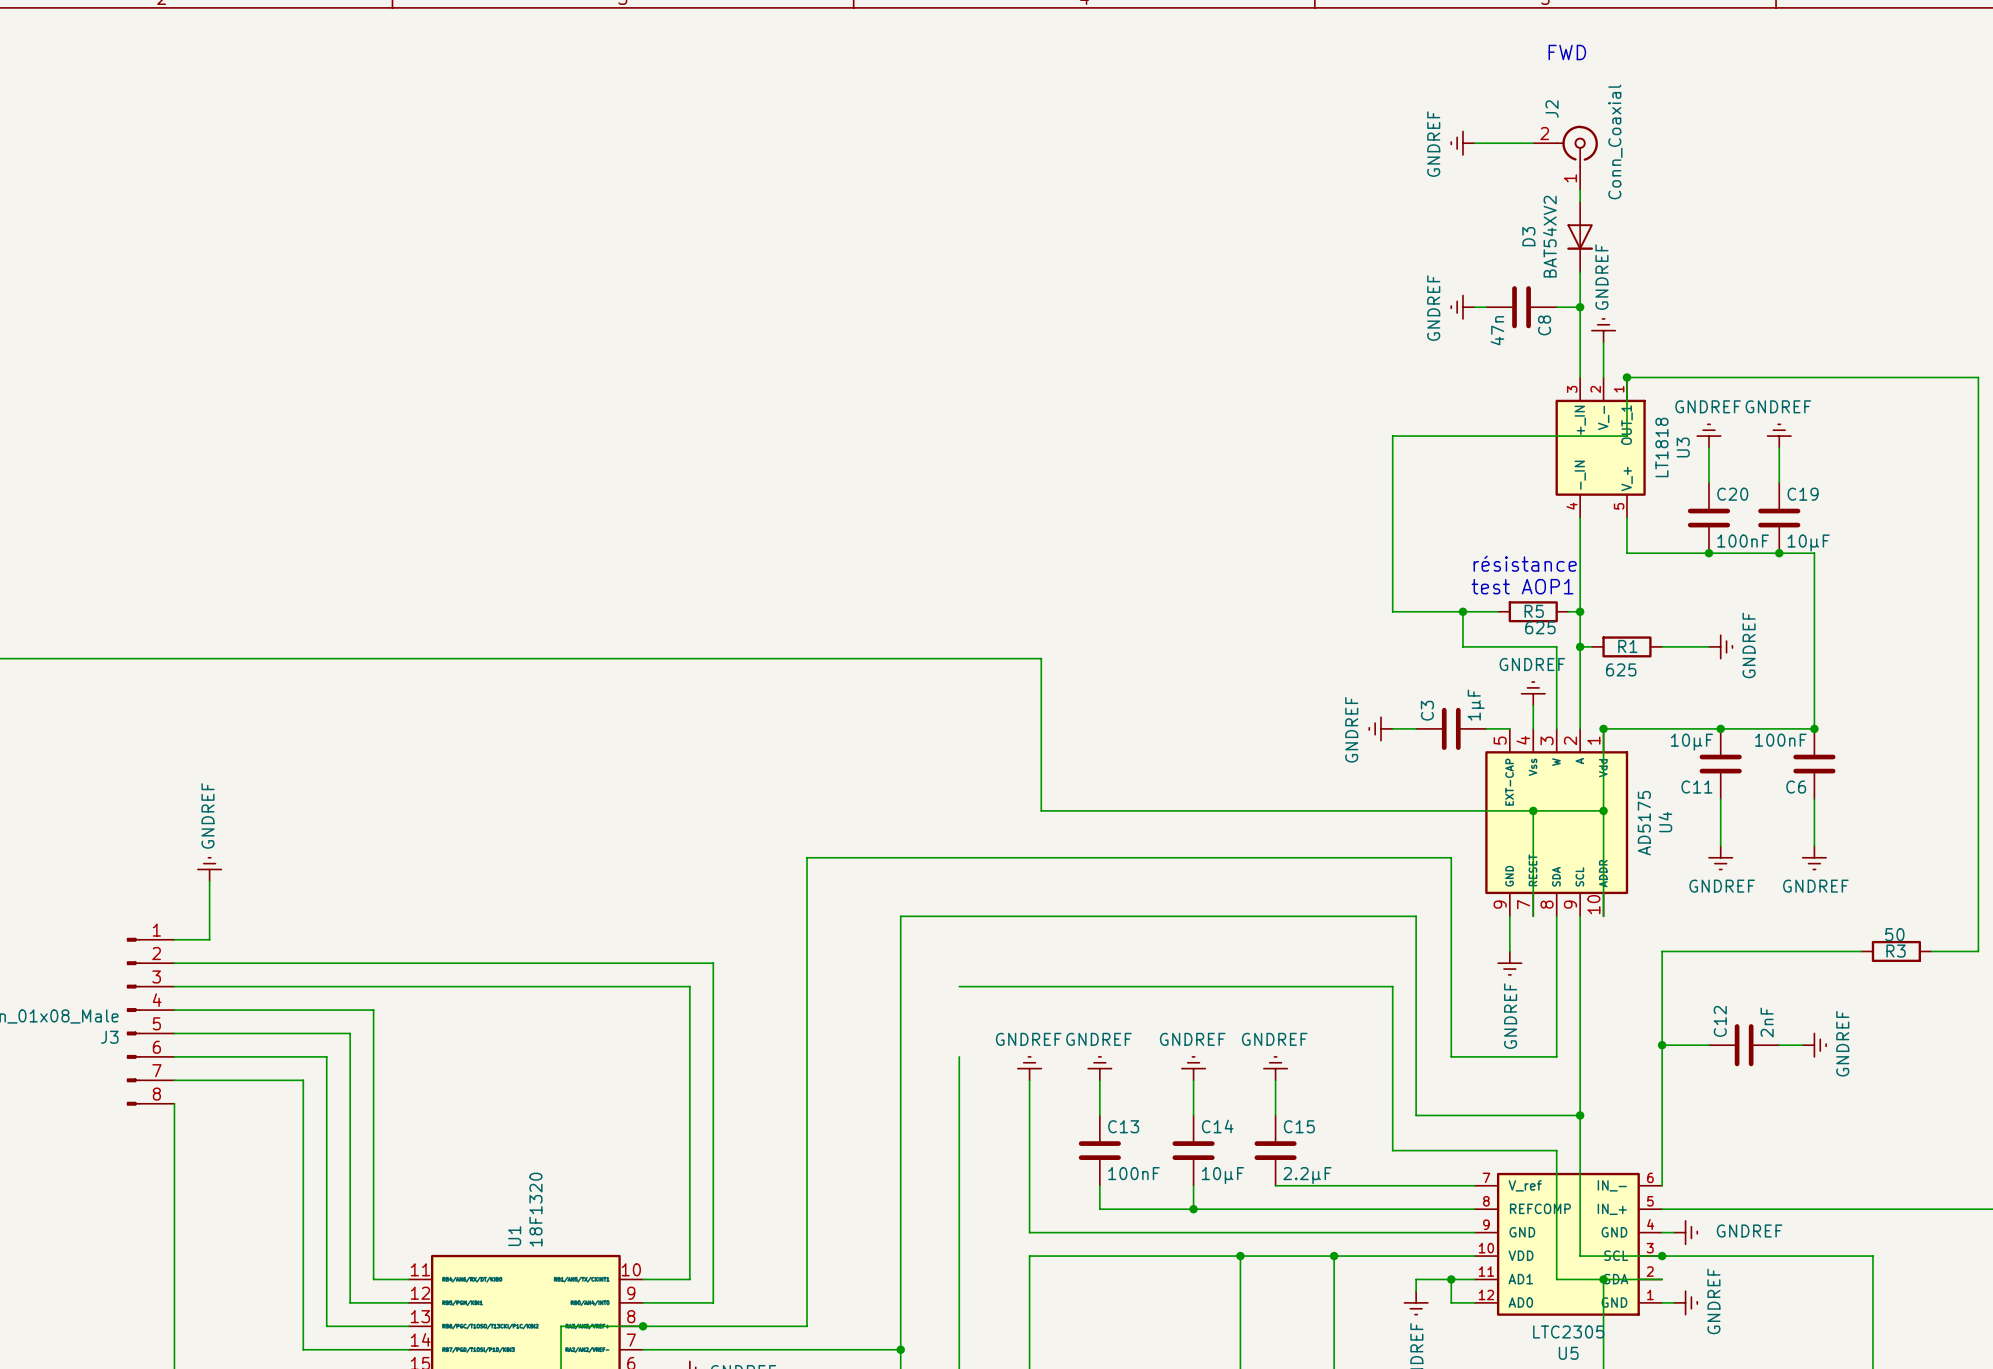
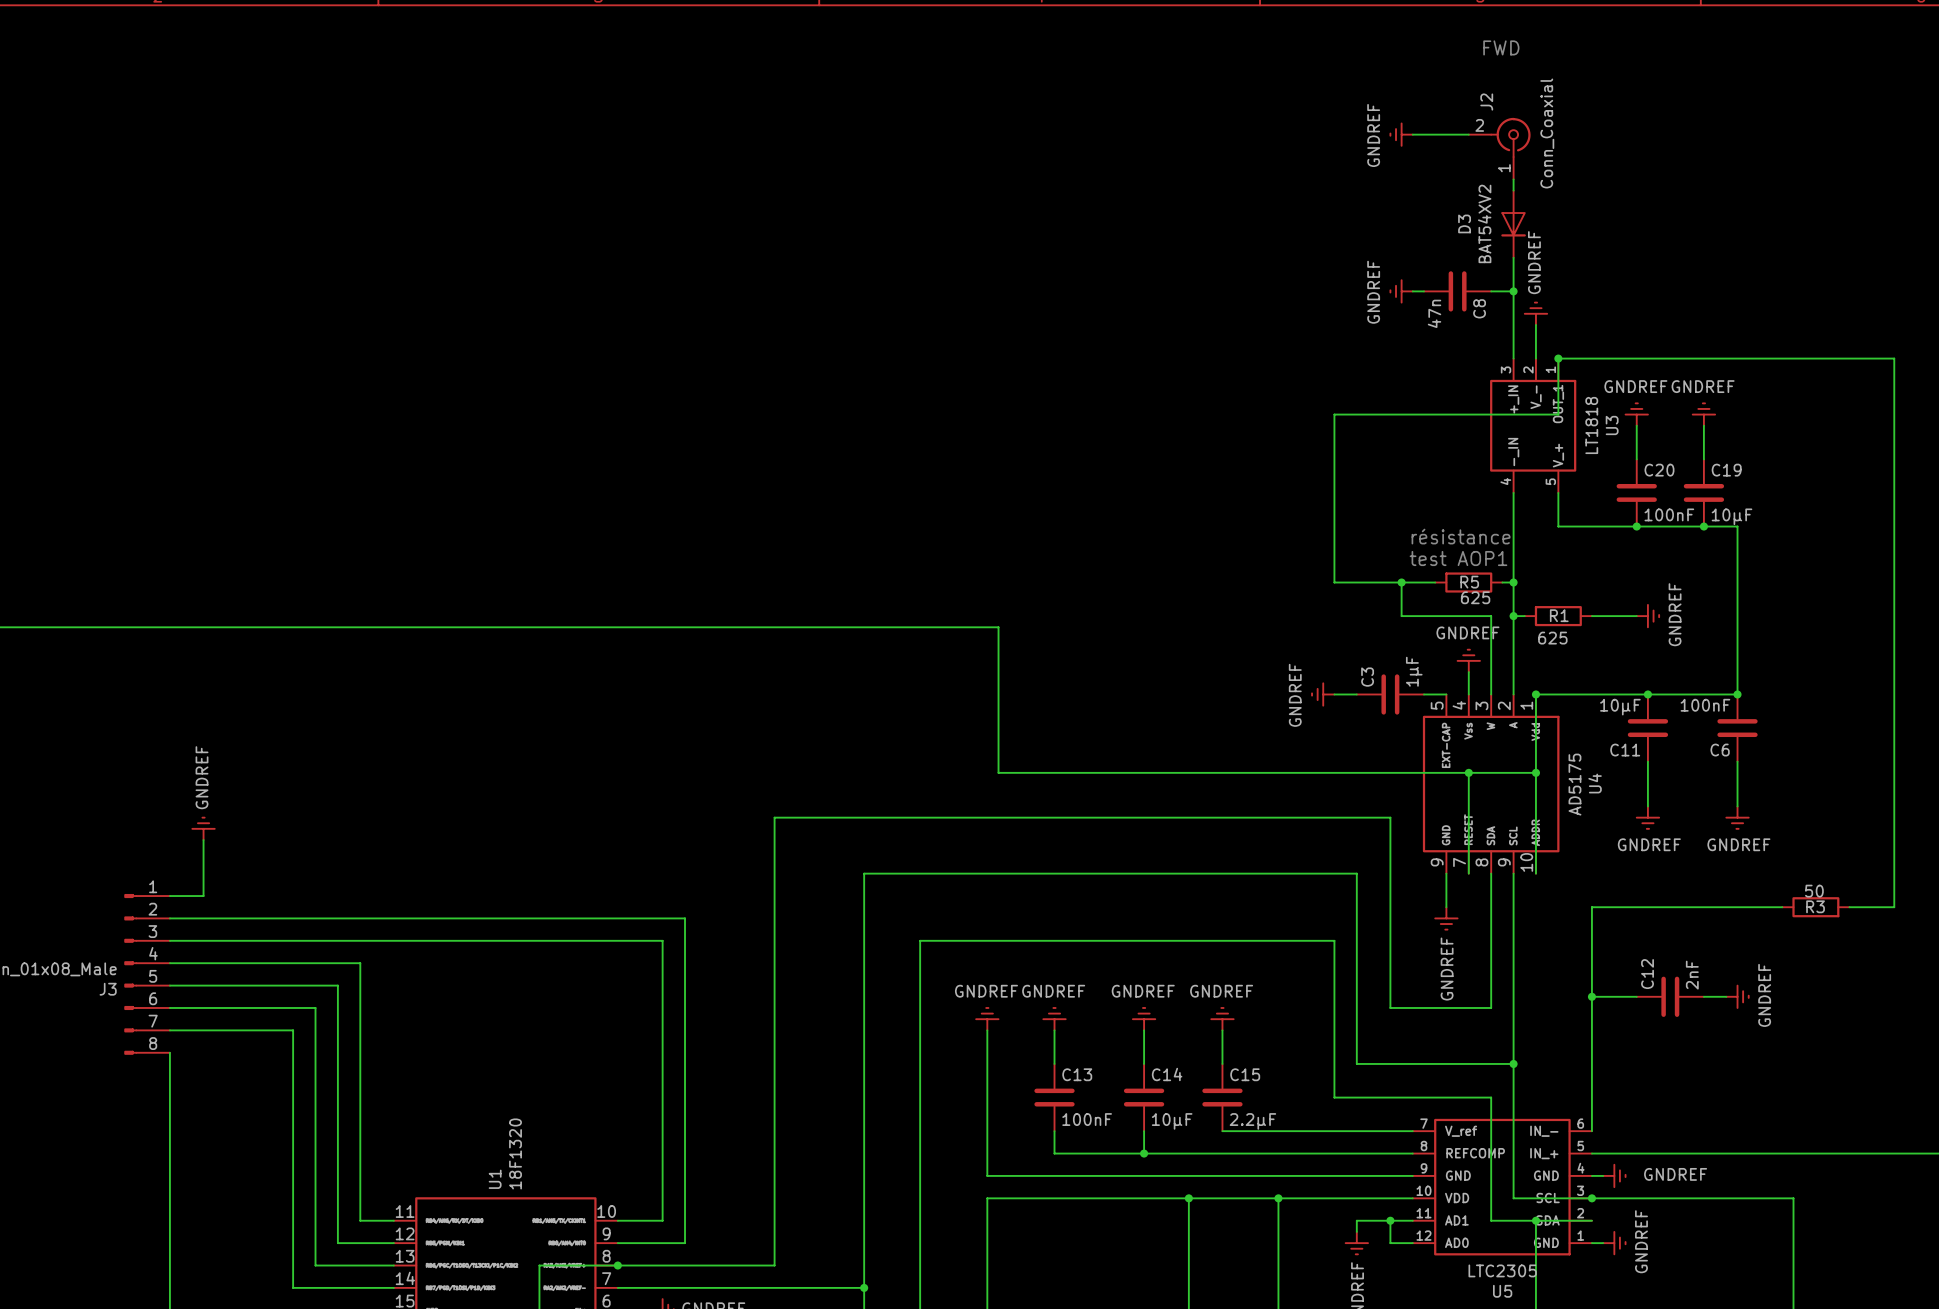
wire: none -> (920, 940) (920, 1007)

